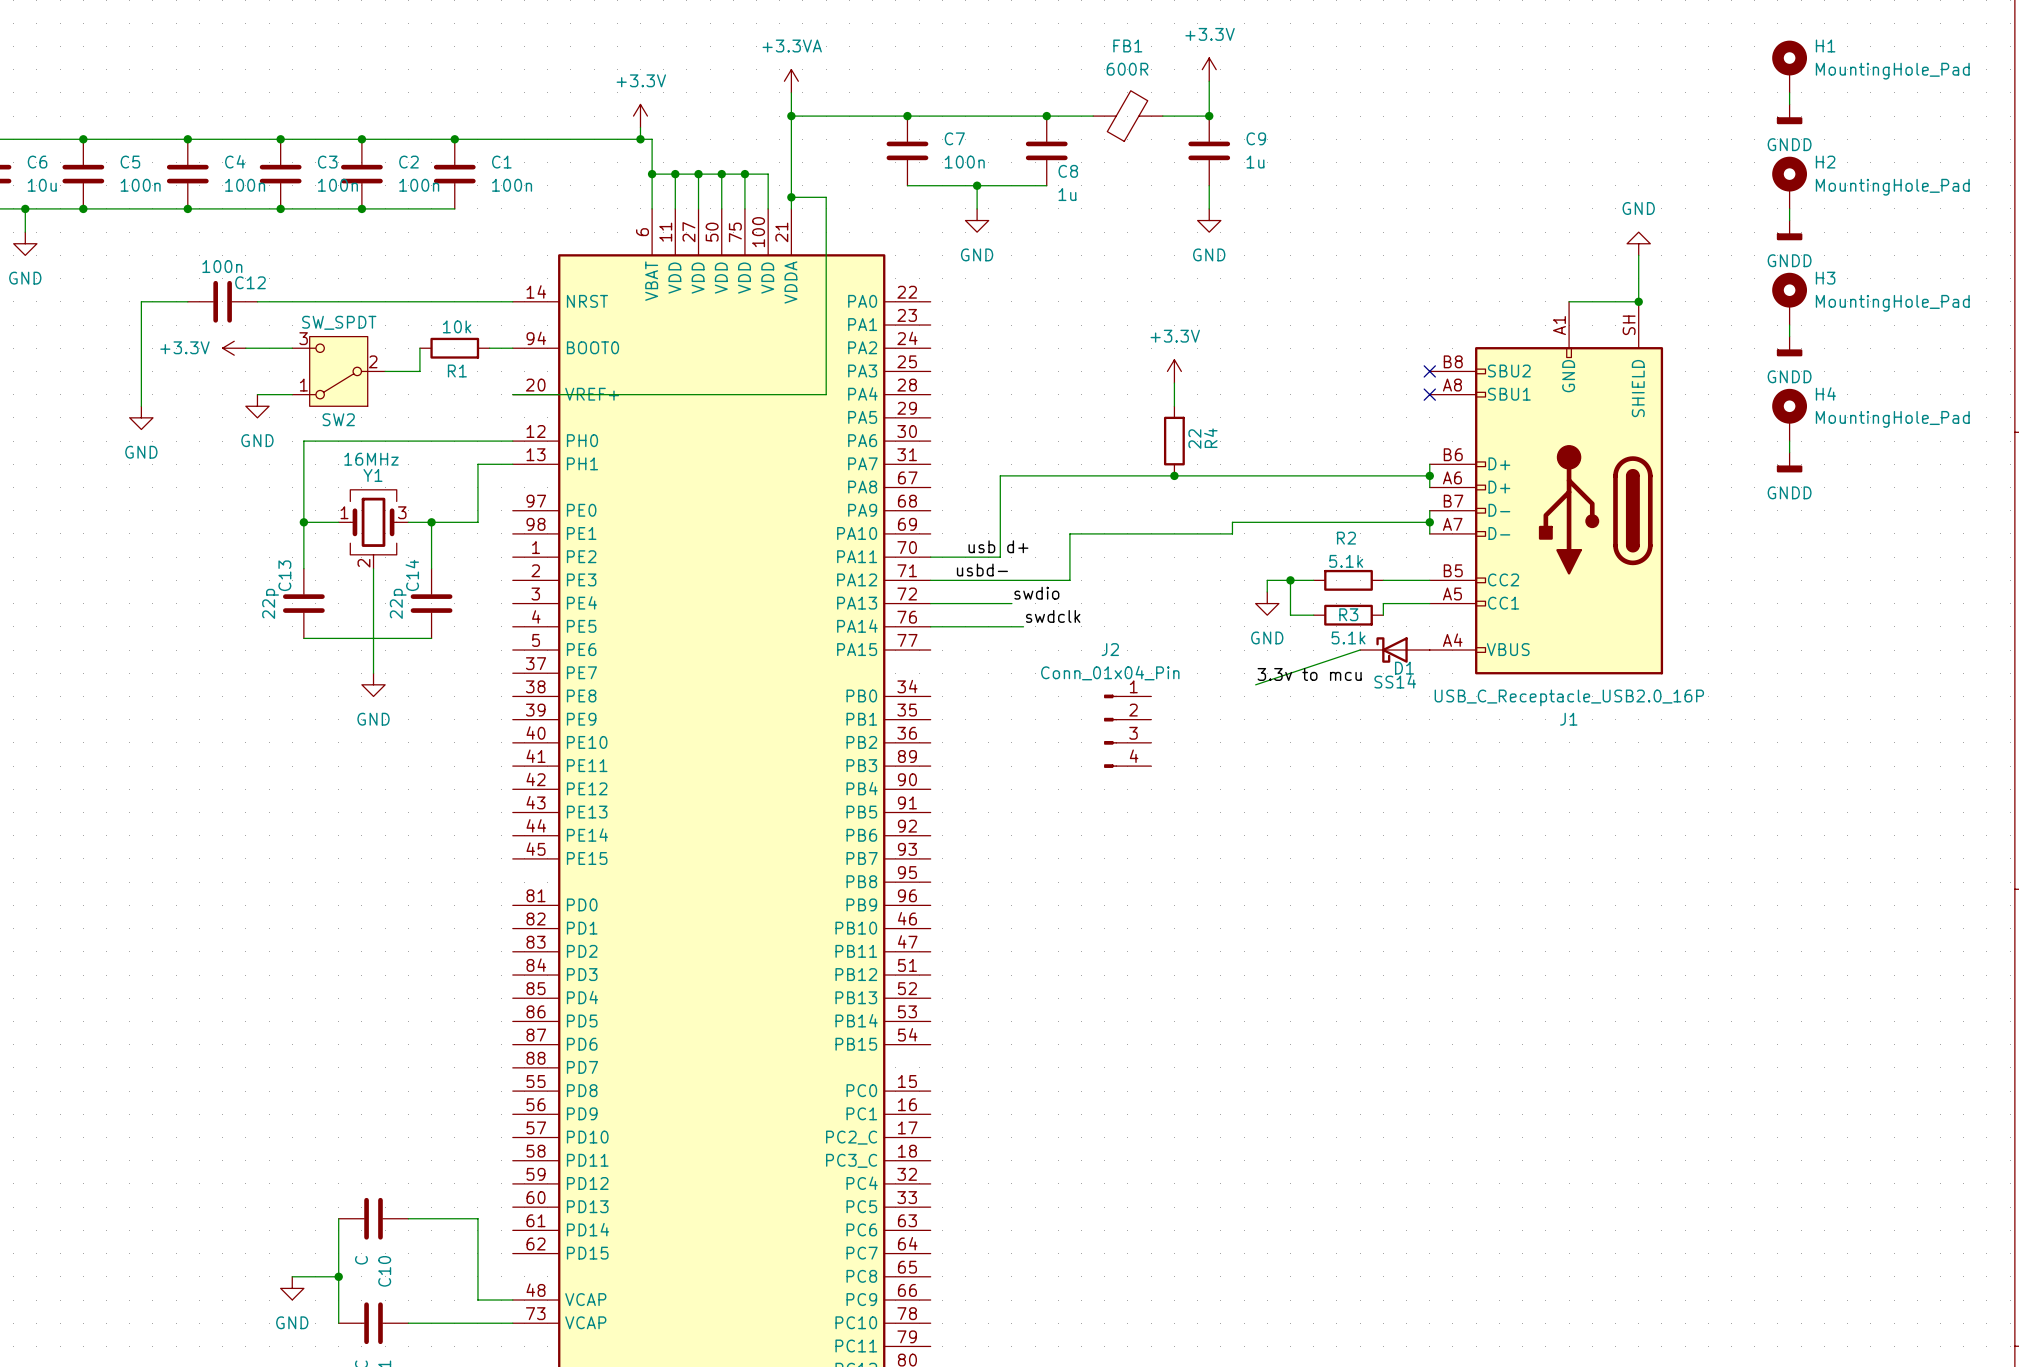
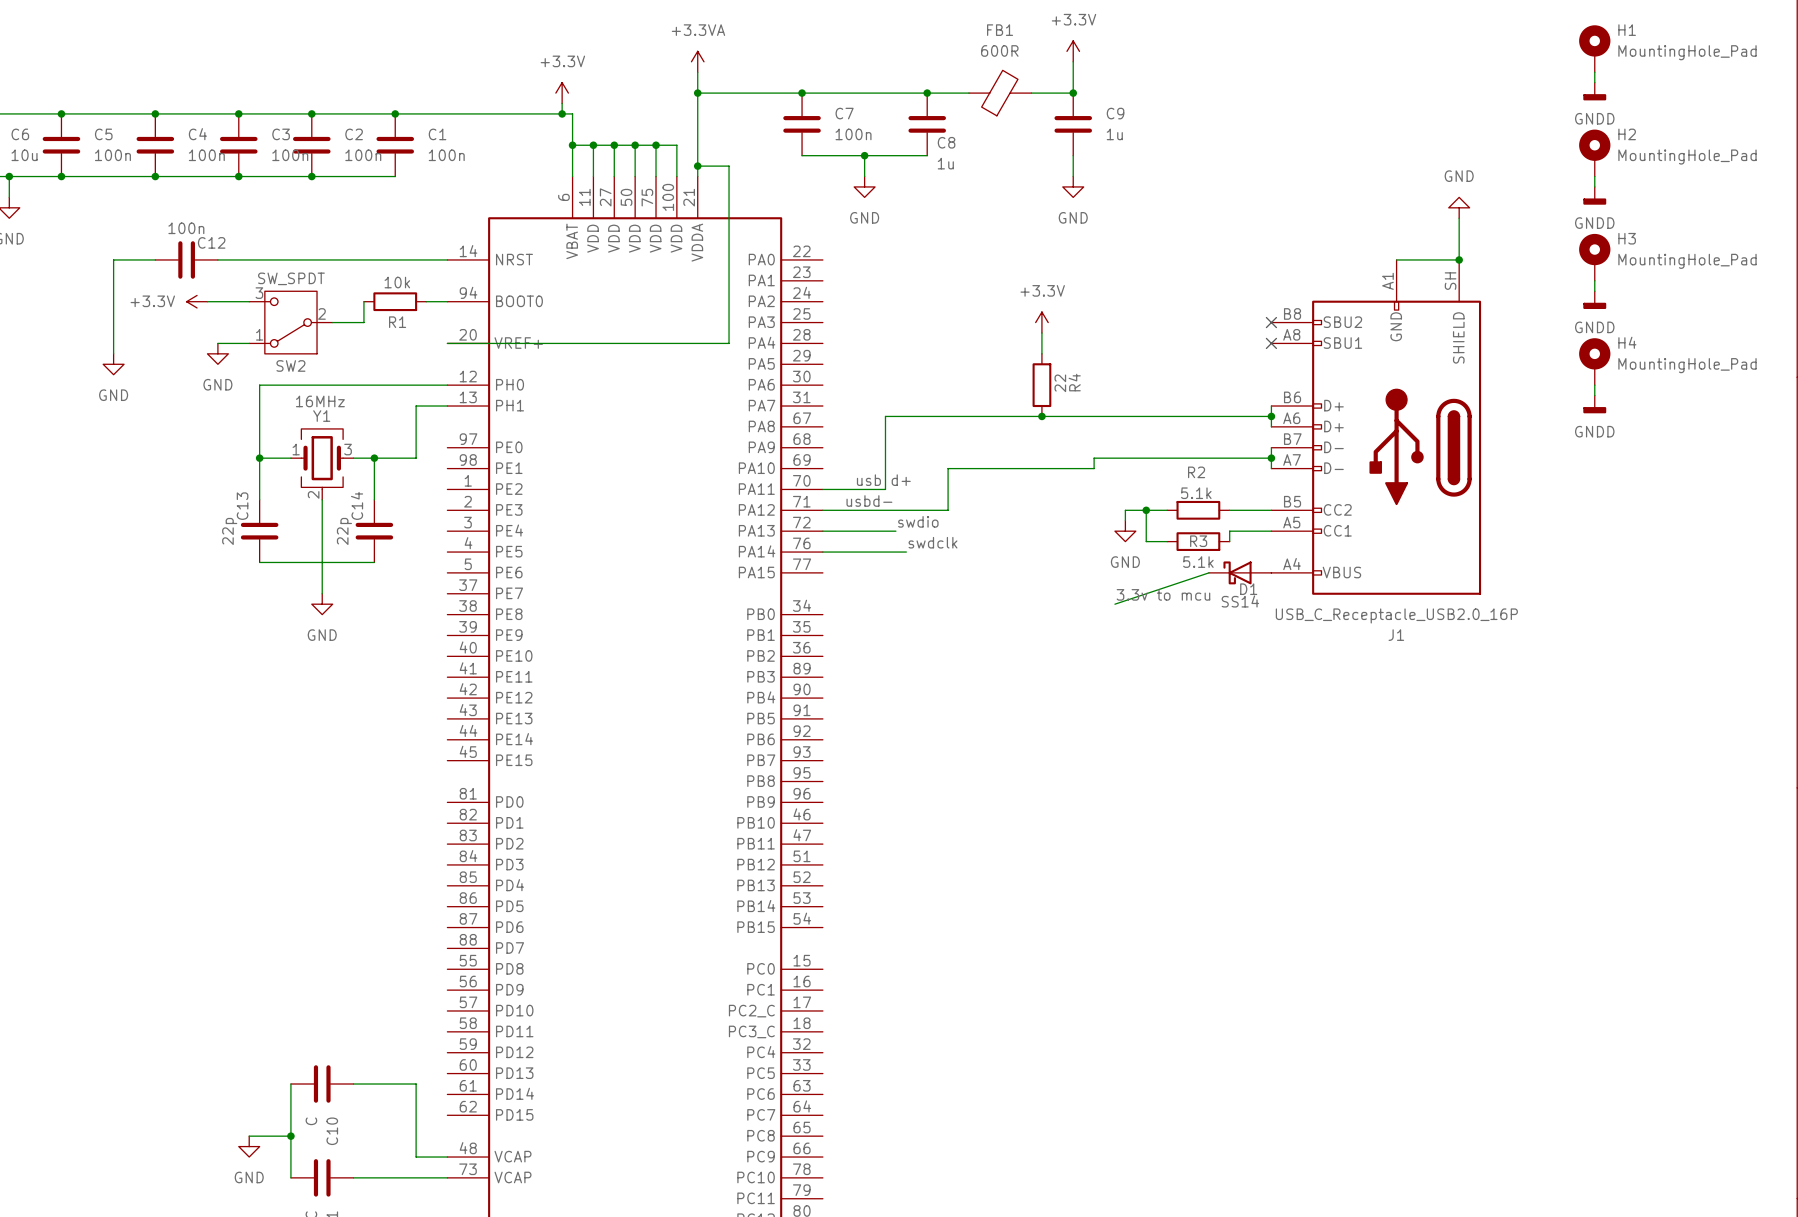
J2: Conn_01x04_Pin (1127, 731) -> none

